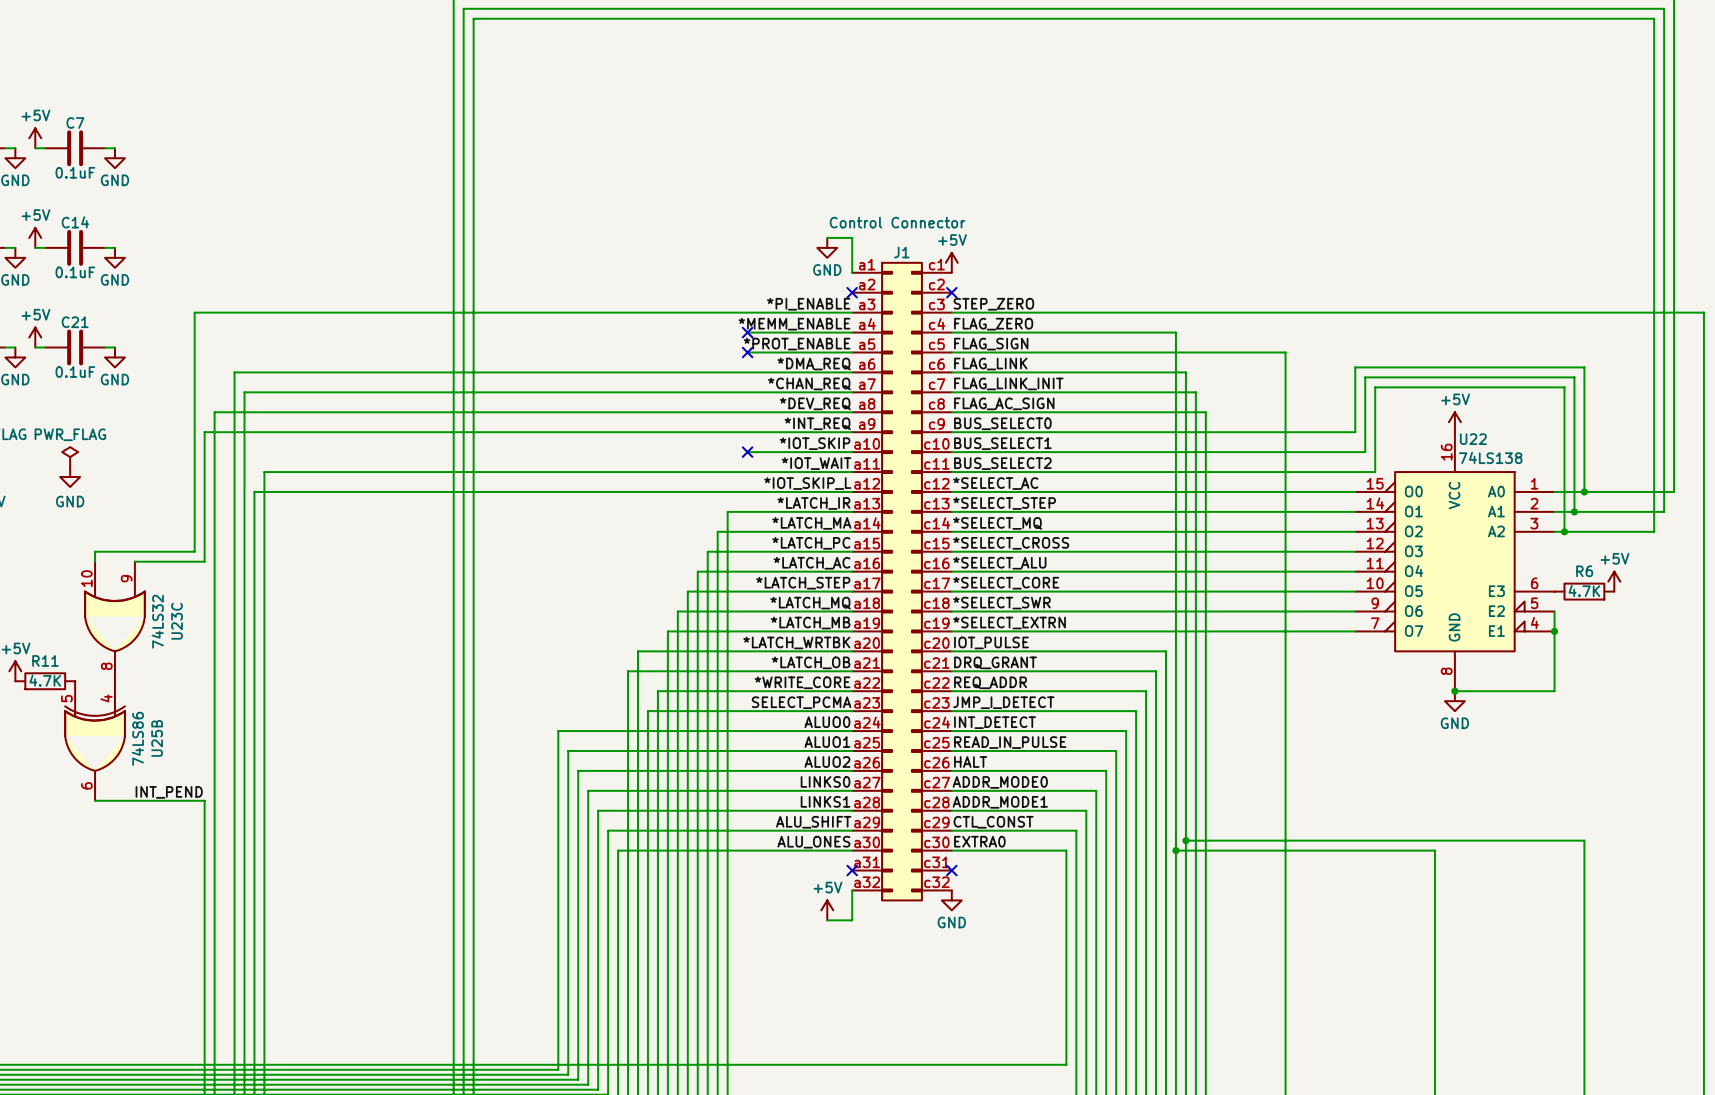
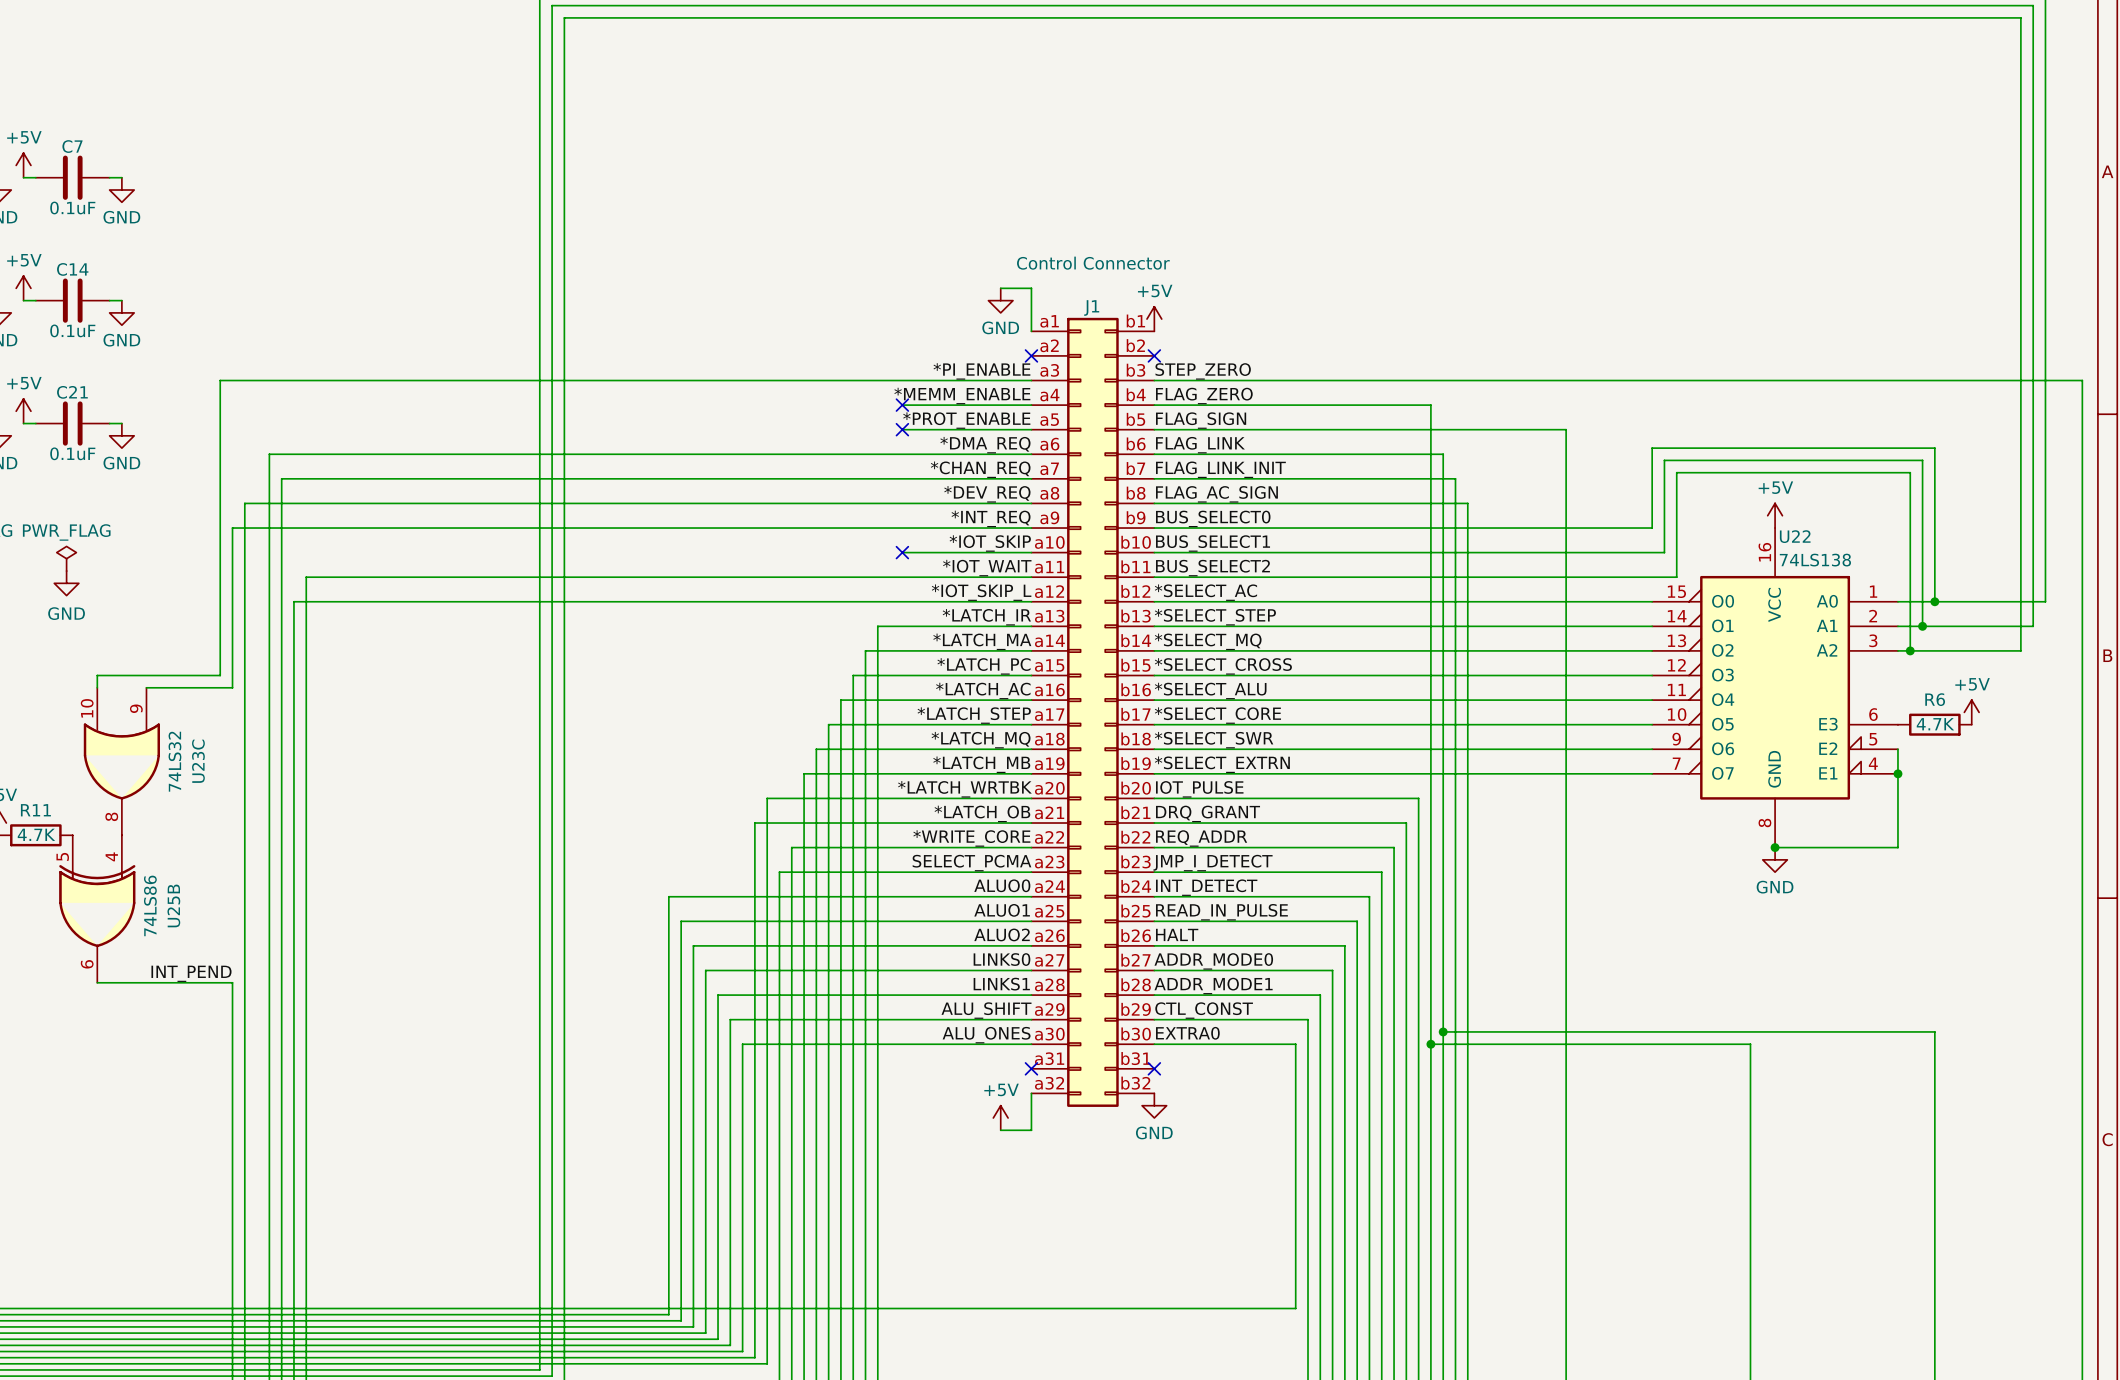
J1 symbol: [852, 261, 952, 902] -> [1031, 317, 1155, 1107]

